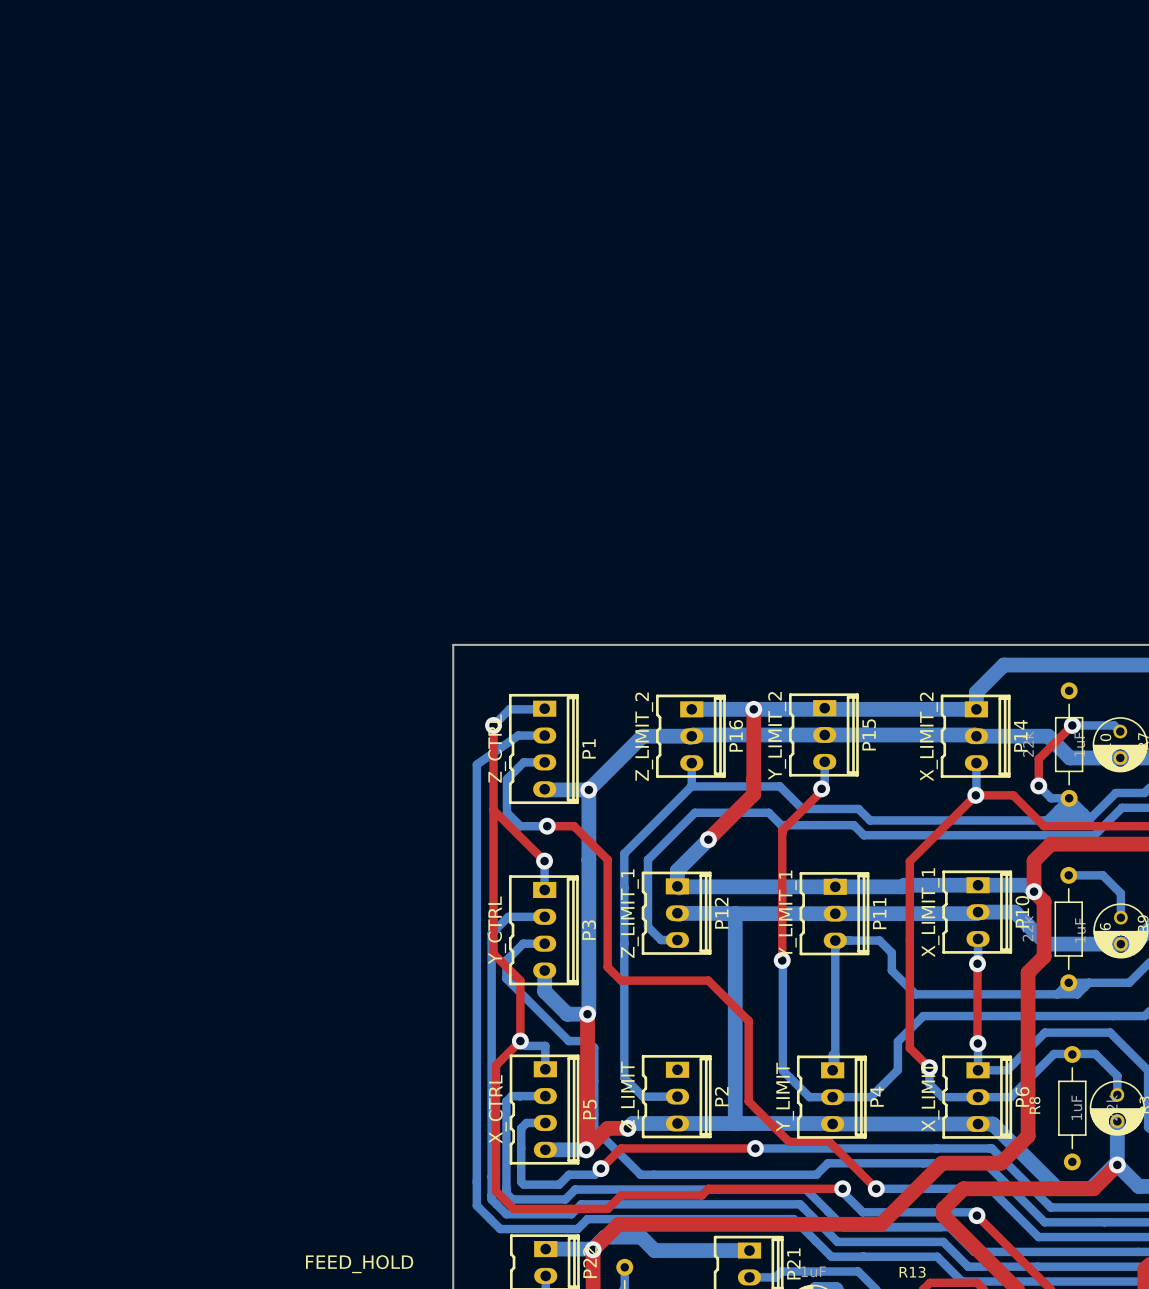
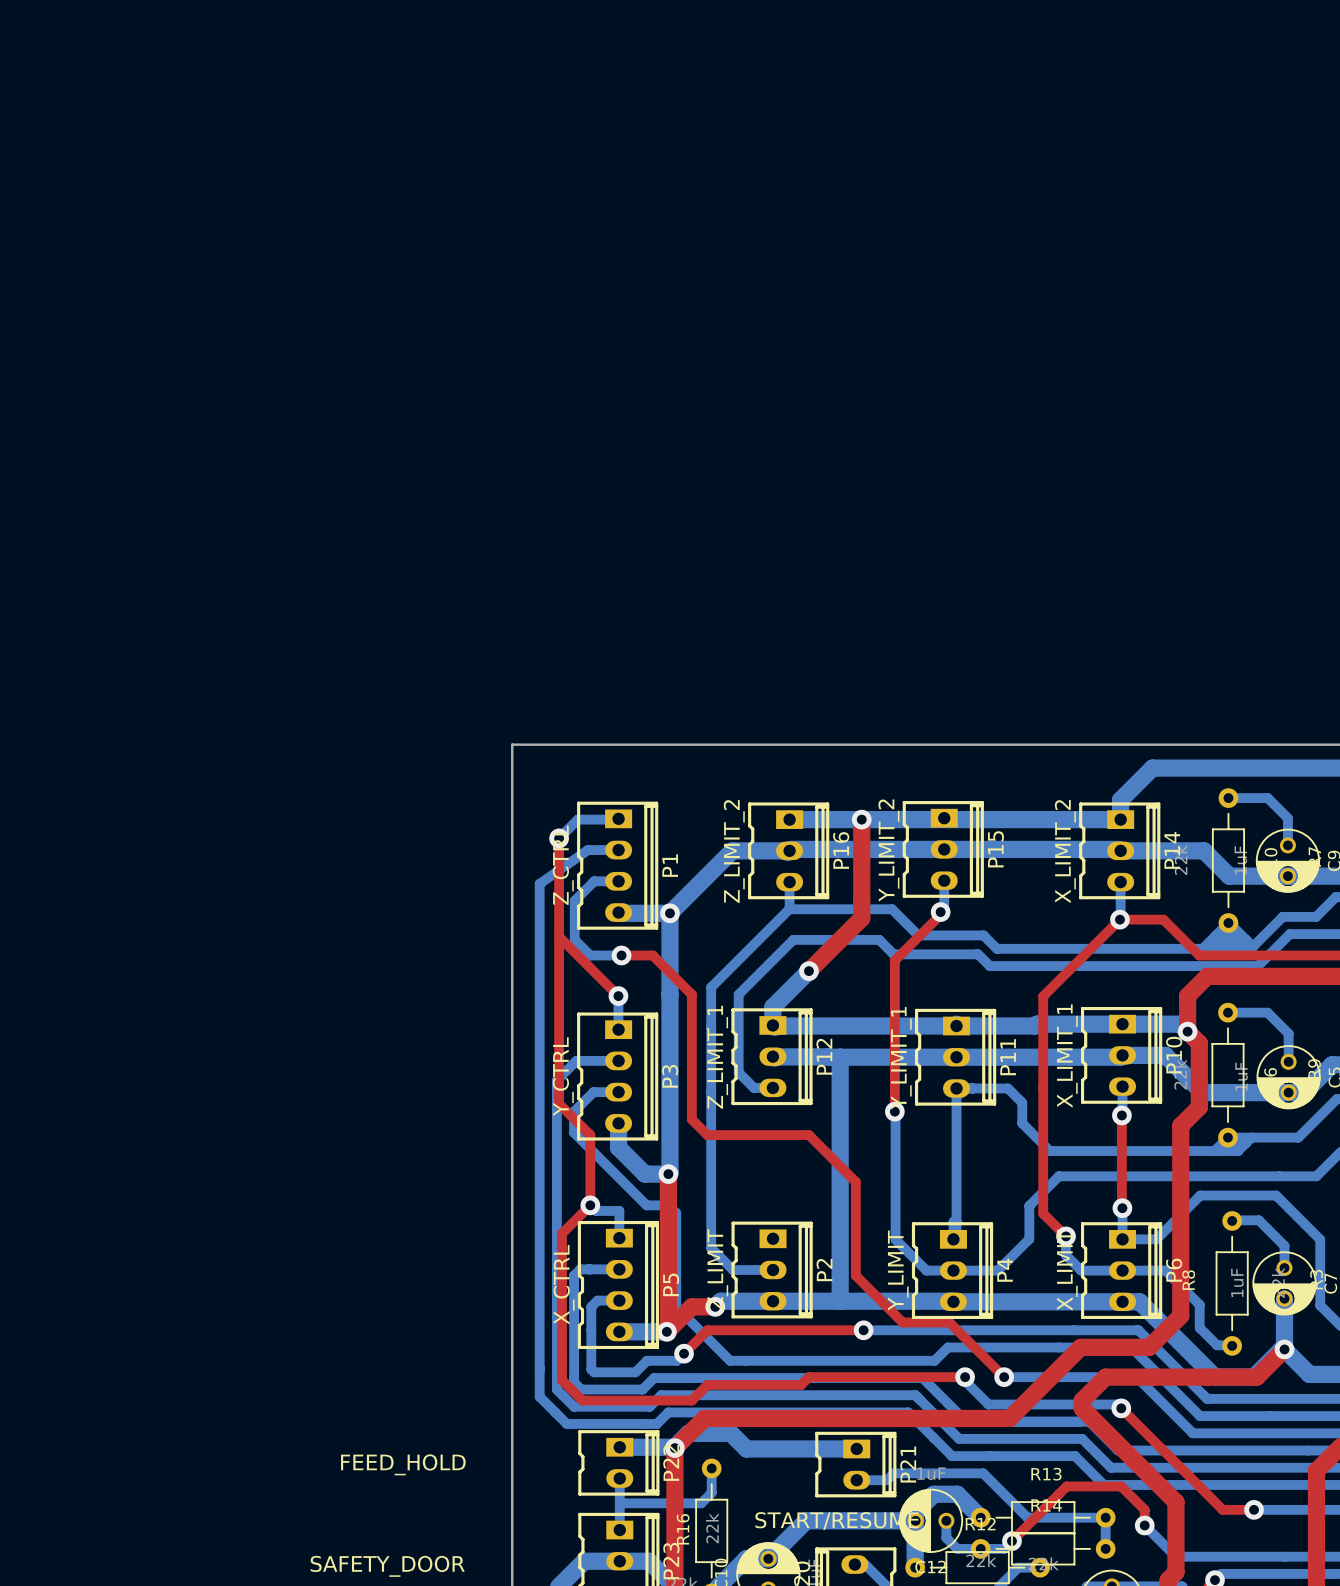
top track: (1072, 725) (1038, 759) (1038, 785) -> none
bottom track: (1072, 725) (1114, 725) (1120, 731) -> (1228, 798) (1267, 798) (1287, 818) (1287, 845)
via: (1072, 725) -> none
bottom track: (1038, 785) (1051, 798) (1069, 798) -> none
via: (1038, 785) -> none
bottom track: (1068, 1053) (1054, 1053) (1010, 1097) -> (1227, 1345) (1217, 1345) (1199, 1327) (1199, 1304) (1165, 1270) (1160, 1270)

